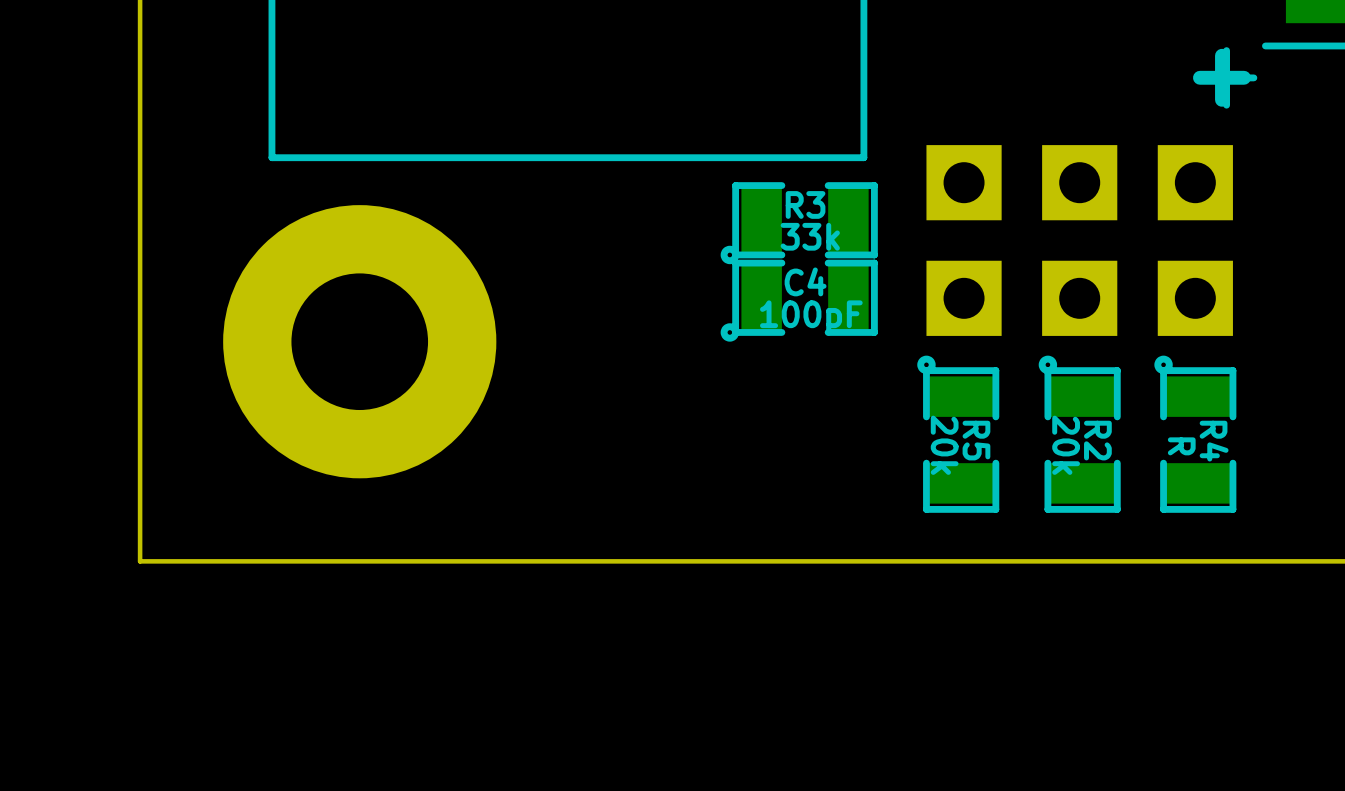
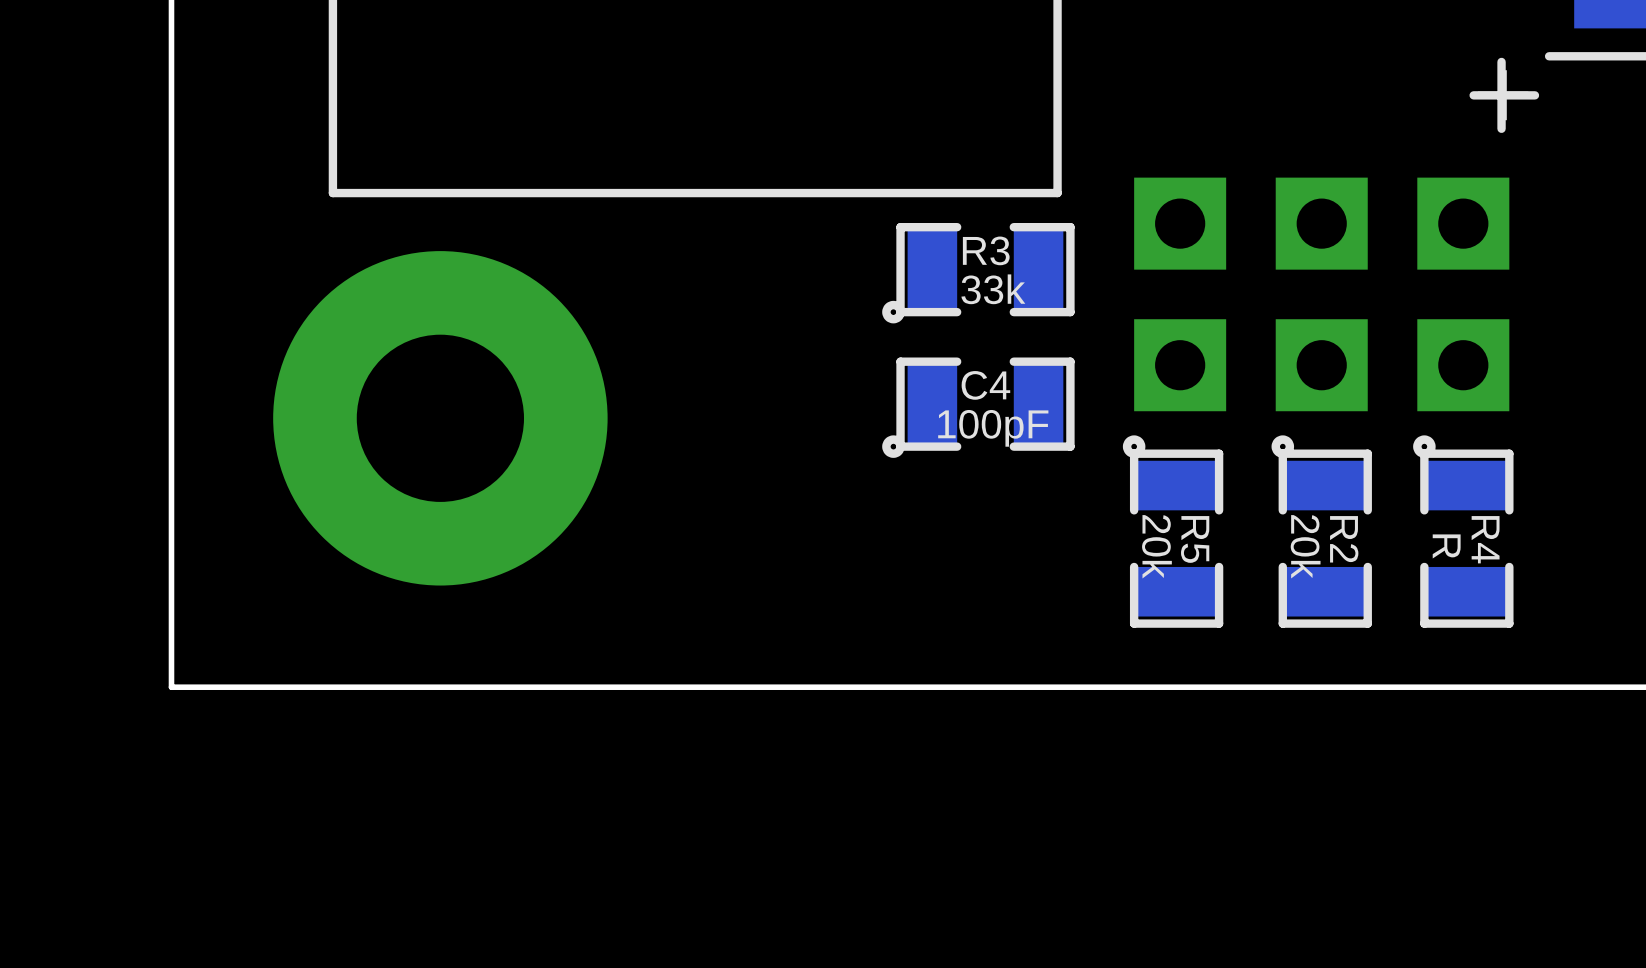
C4 position: (799, 300) -> (978, 407)

